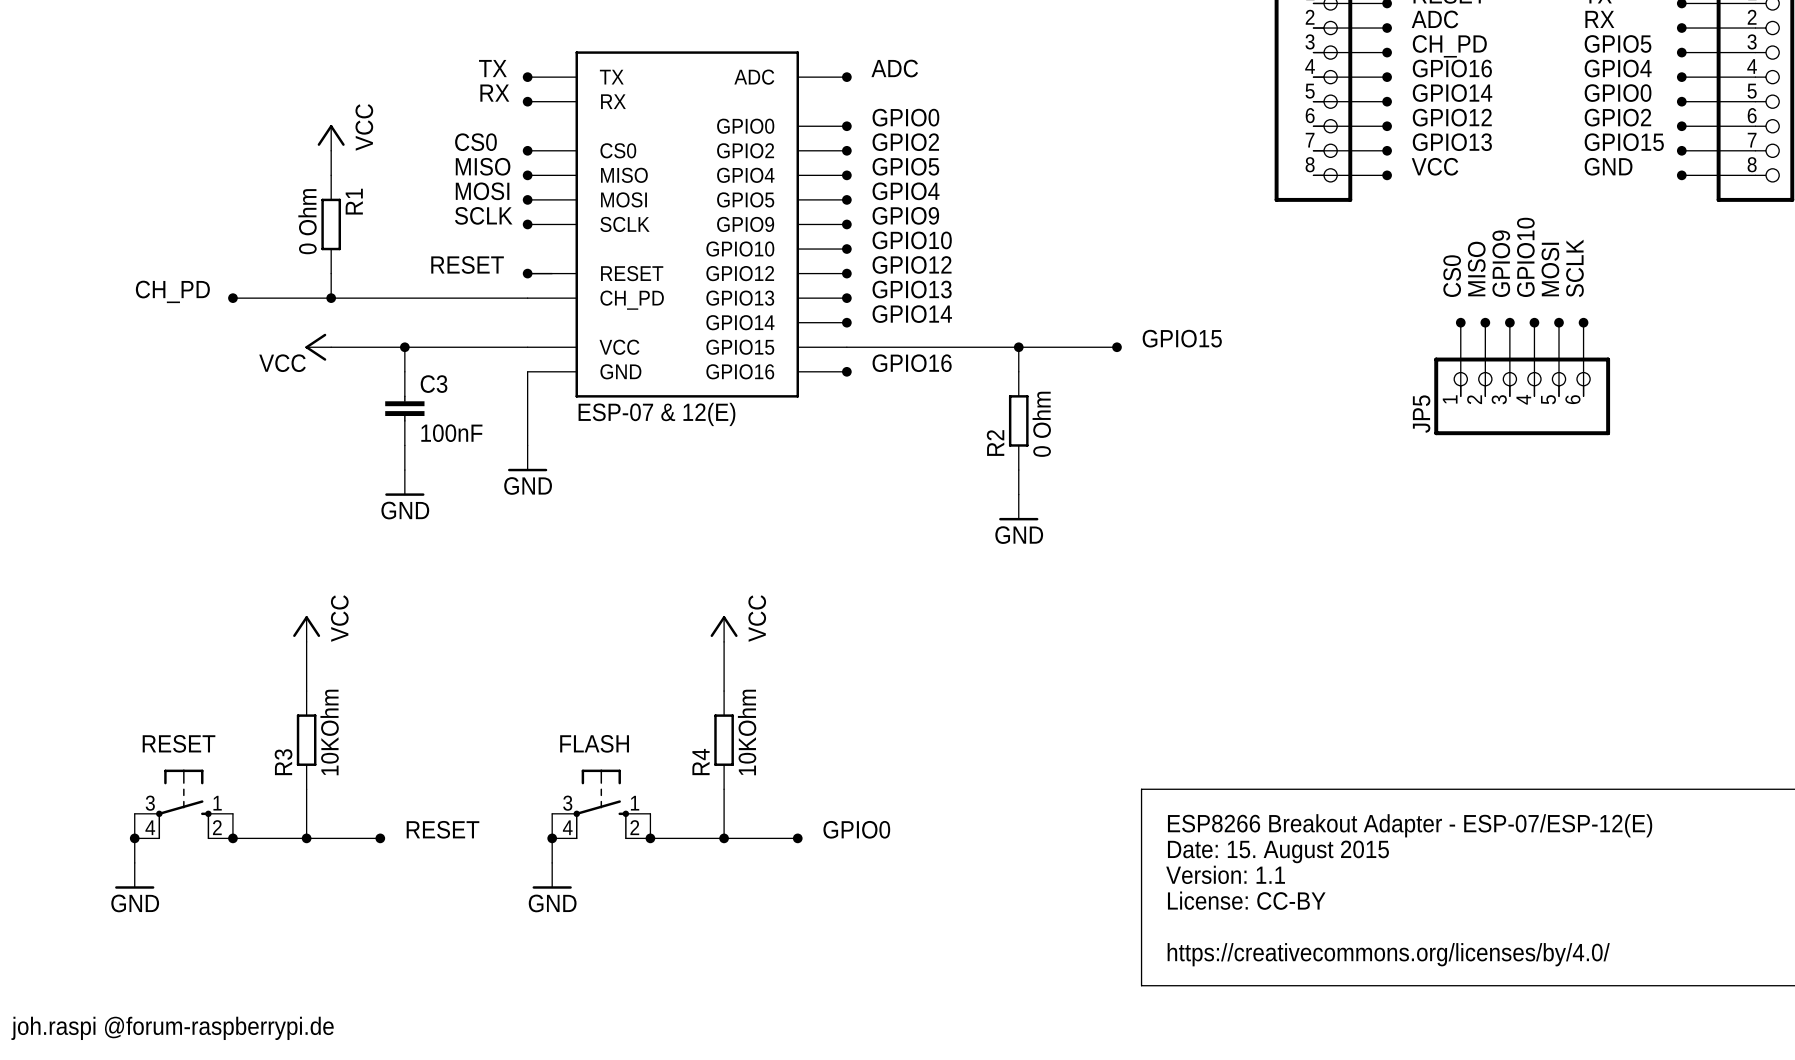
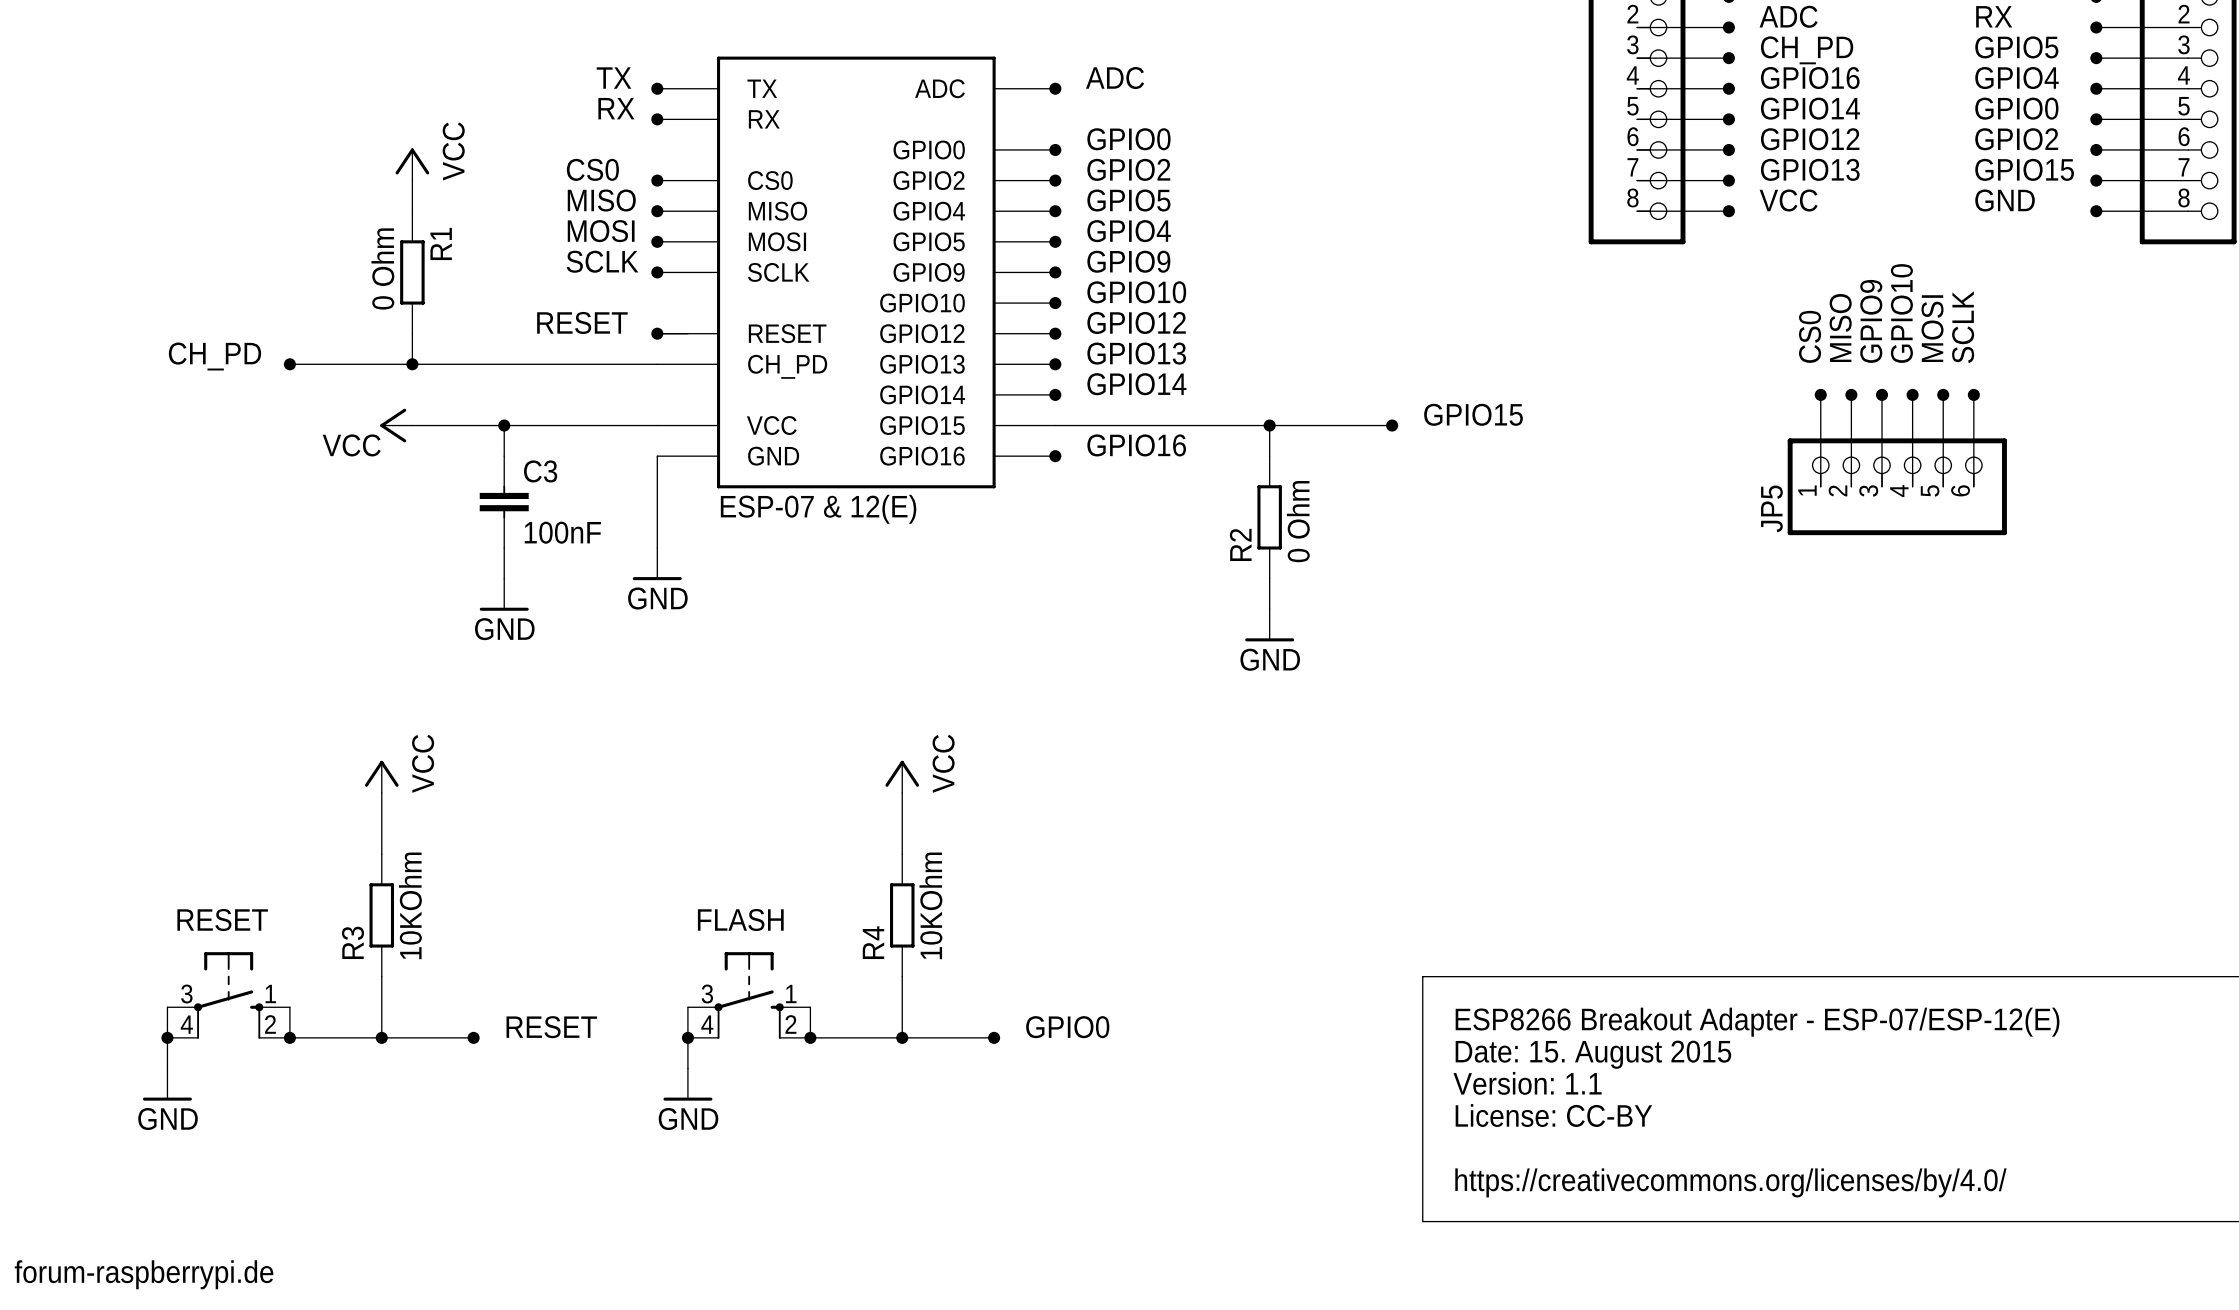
text: joh.raspi @forum-raspberrypi.de (172, 1028) -> forum-raspberrypi.de (144, 1274)

